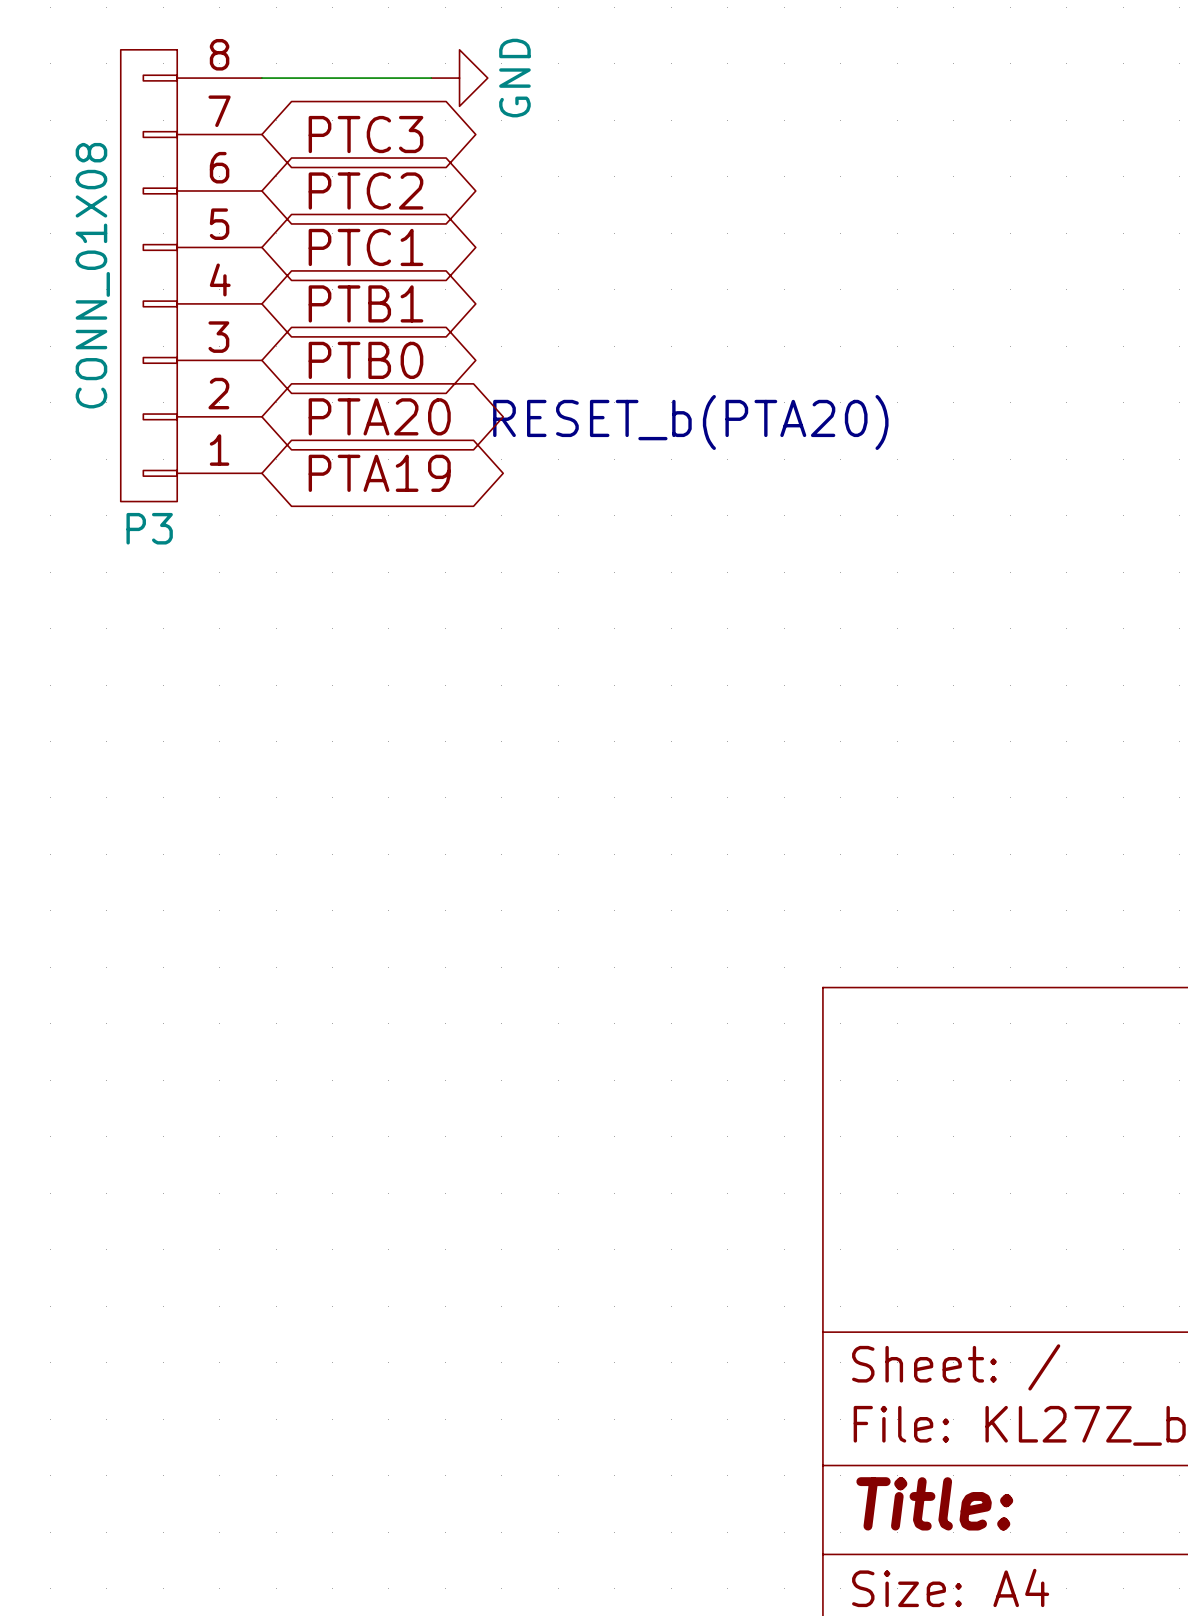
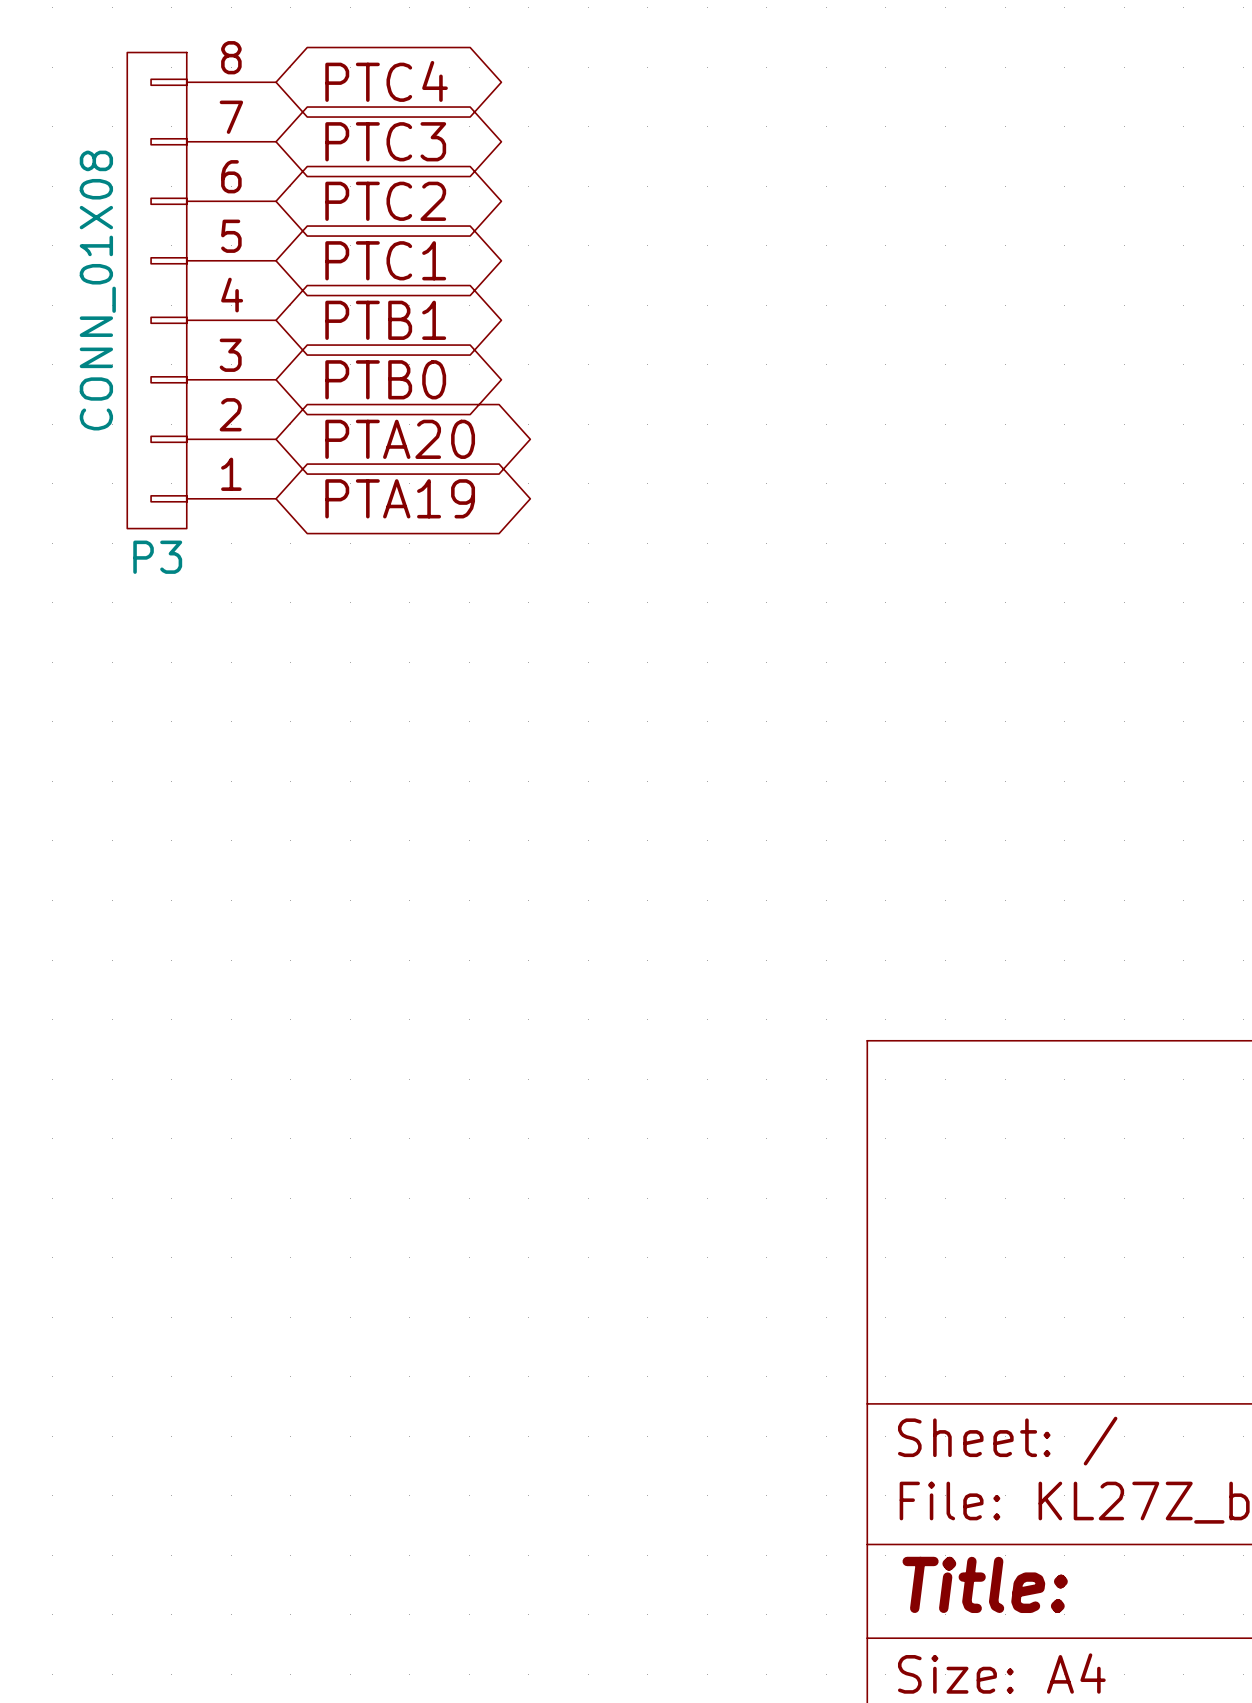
global label: none -> PTC4 (386, 81)
wire: (261, 78) (431, 78) -> none
power symbol: GND (459, 78) -> none
text: RESET_b(PTA20) (690, 422) -> none

